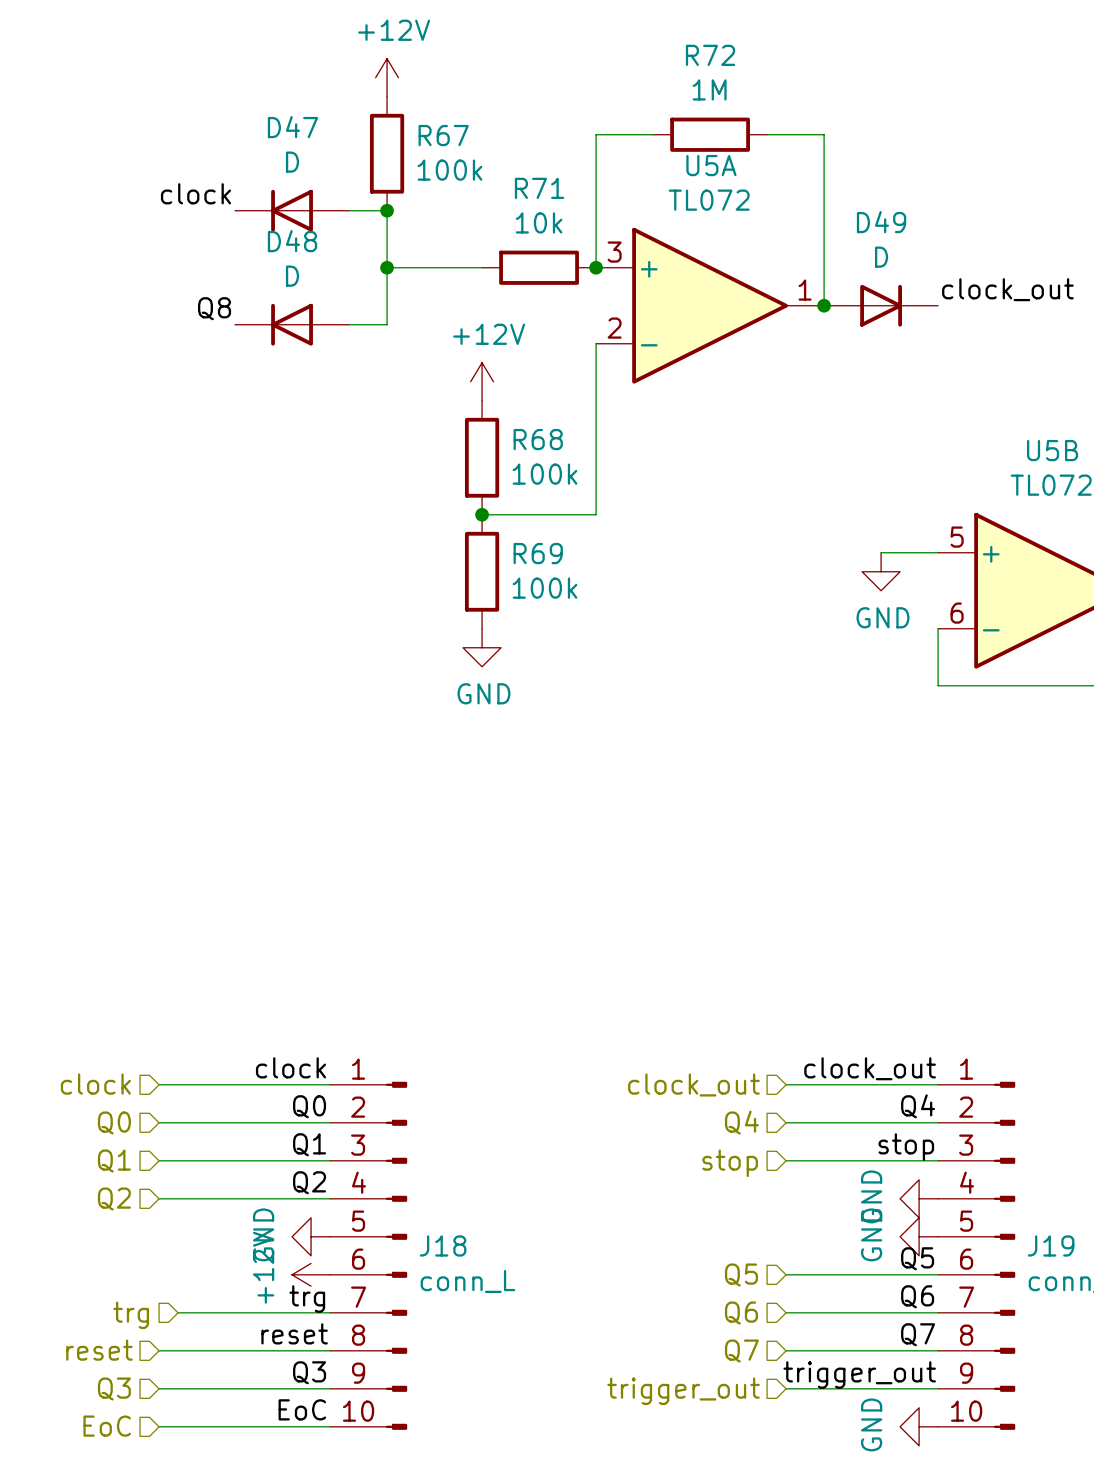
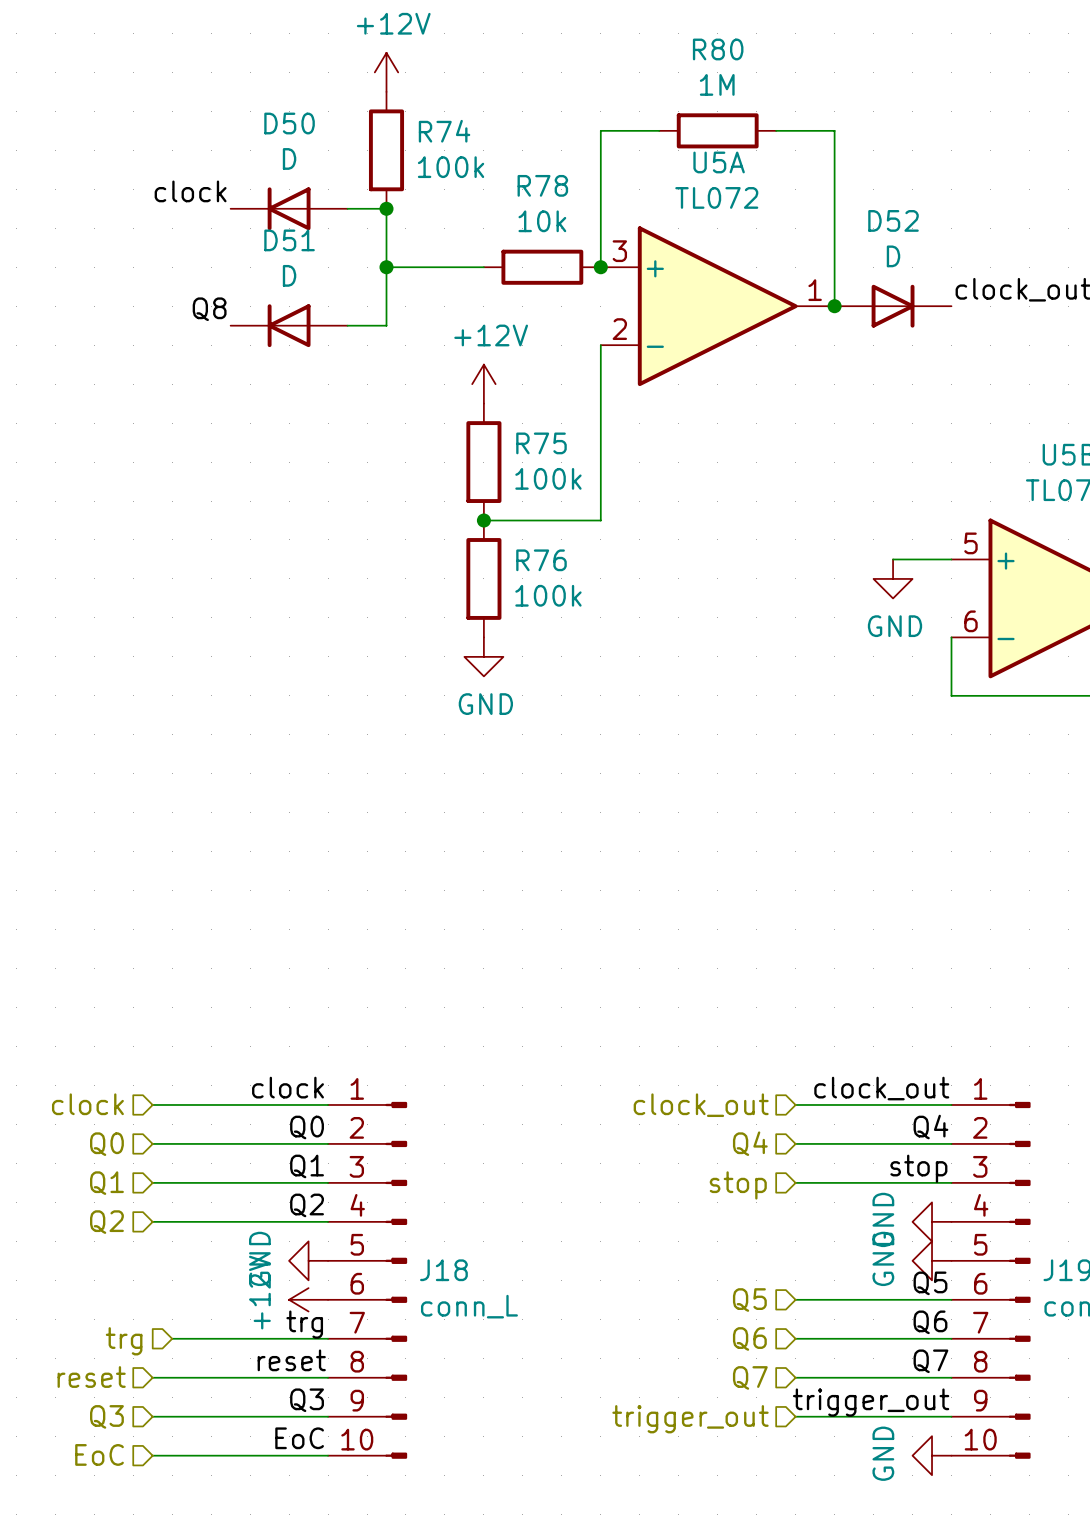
R72 name: R72 (710, 55) -> R80 (718, 49)
D47 name: D47 (292, 127) -> D50 (289, 123)
R67 name: R67 (443, 135) -> R74 (444, 131)
R71 name: R71 (539, 188) -> R78 (542, 185)
D49 name: D49 (881, 222) -> D52 (893, 220)
D48 name: D48 (292, 241) -> D51 (289, 240)
R68 name: R68 (538, 439) -> R75 (541, 443)
R69 name: R69 (538, 553) -> R76 (541, 560)

